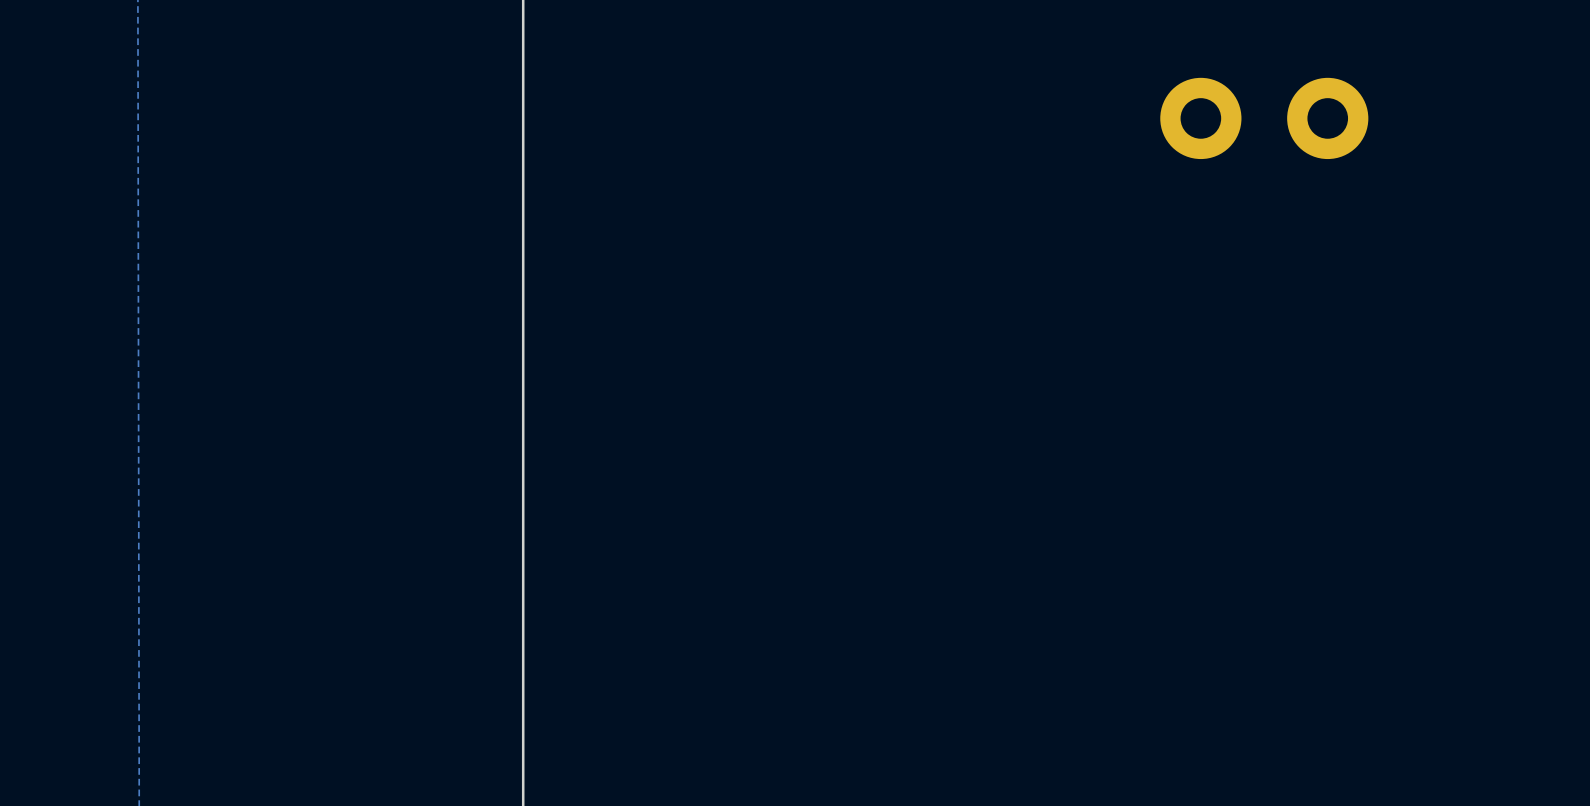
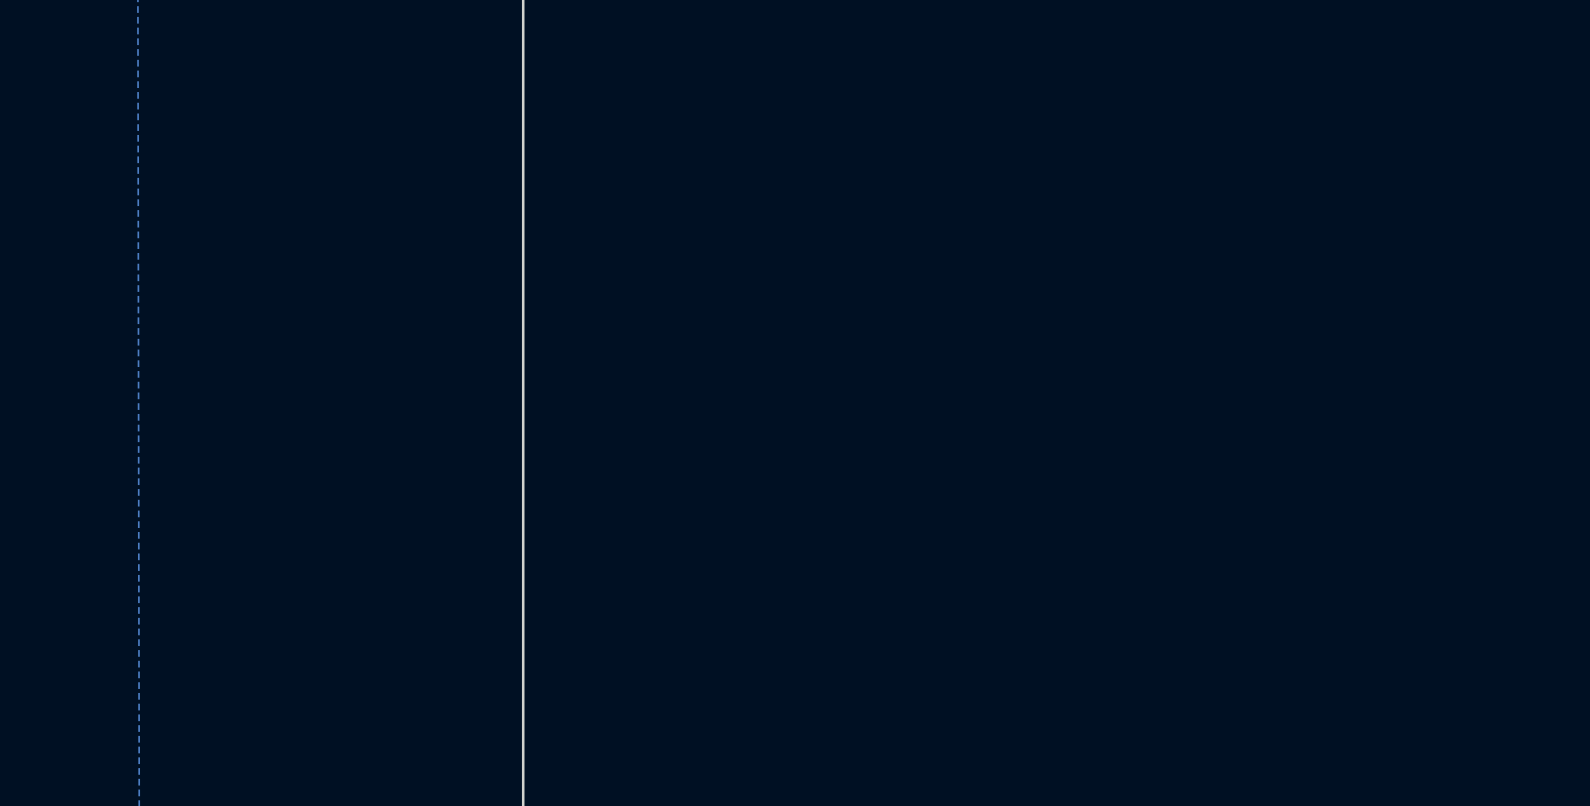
part: (1264, 118) -> none

